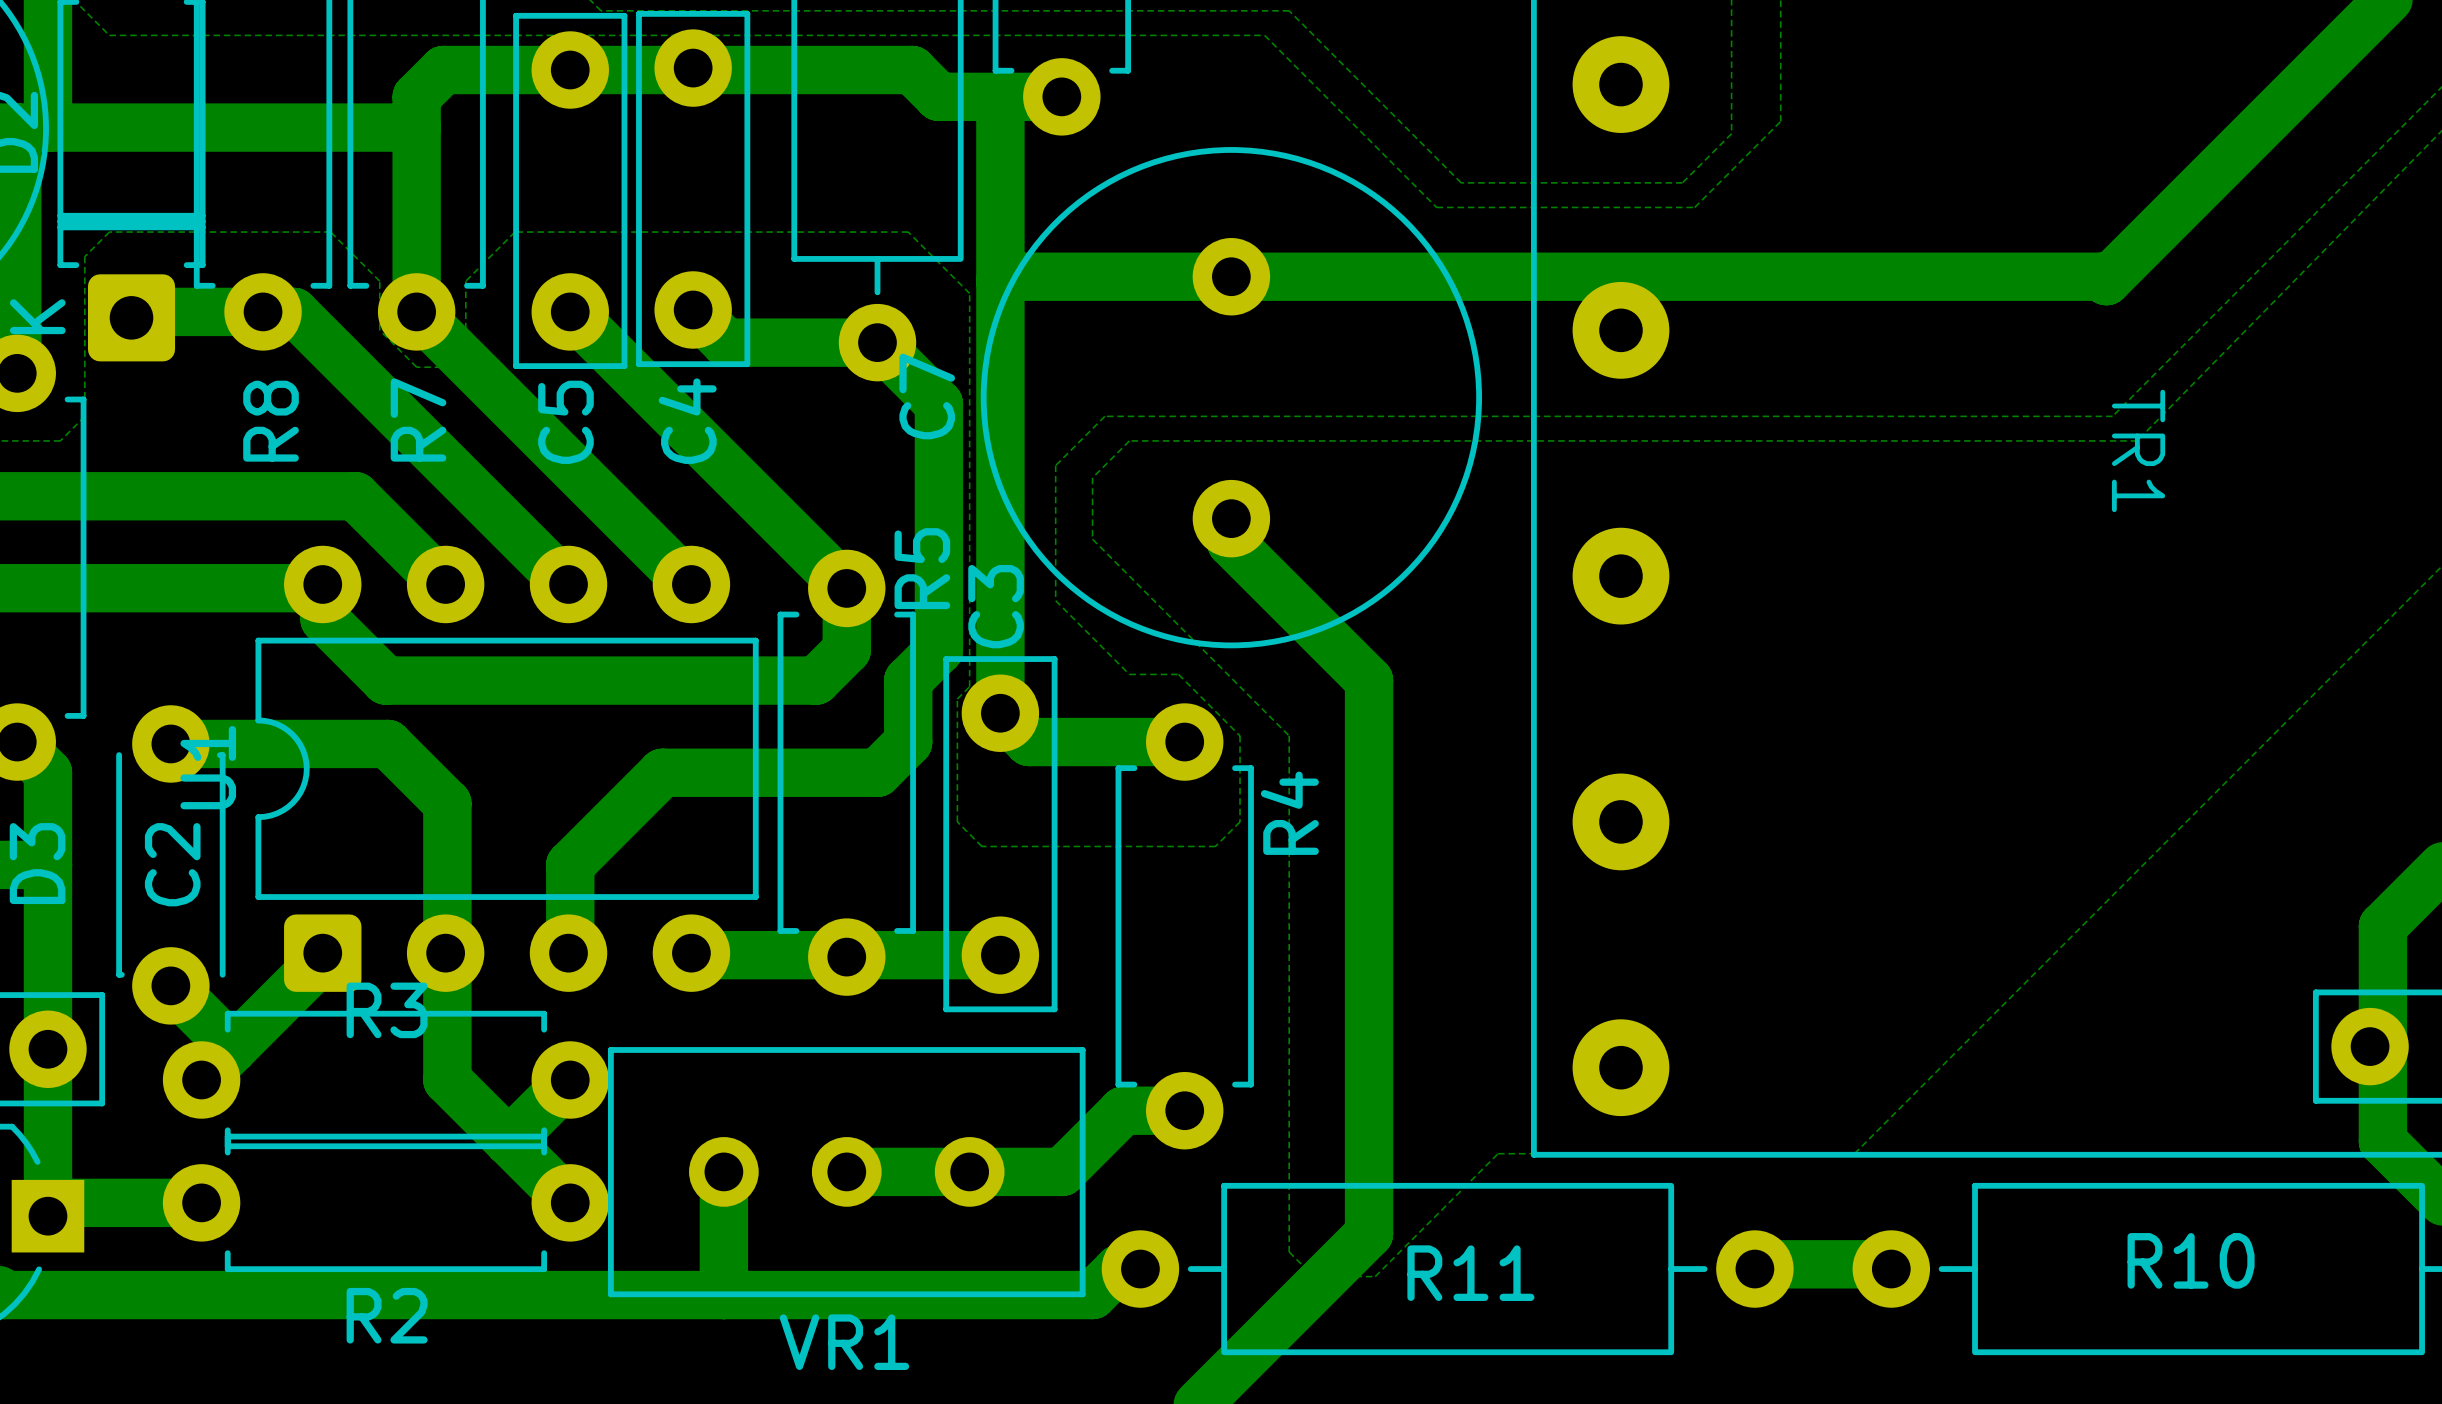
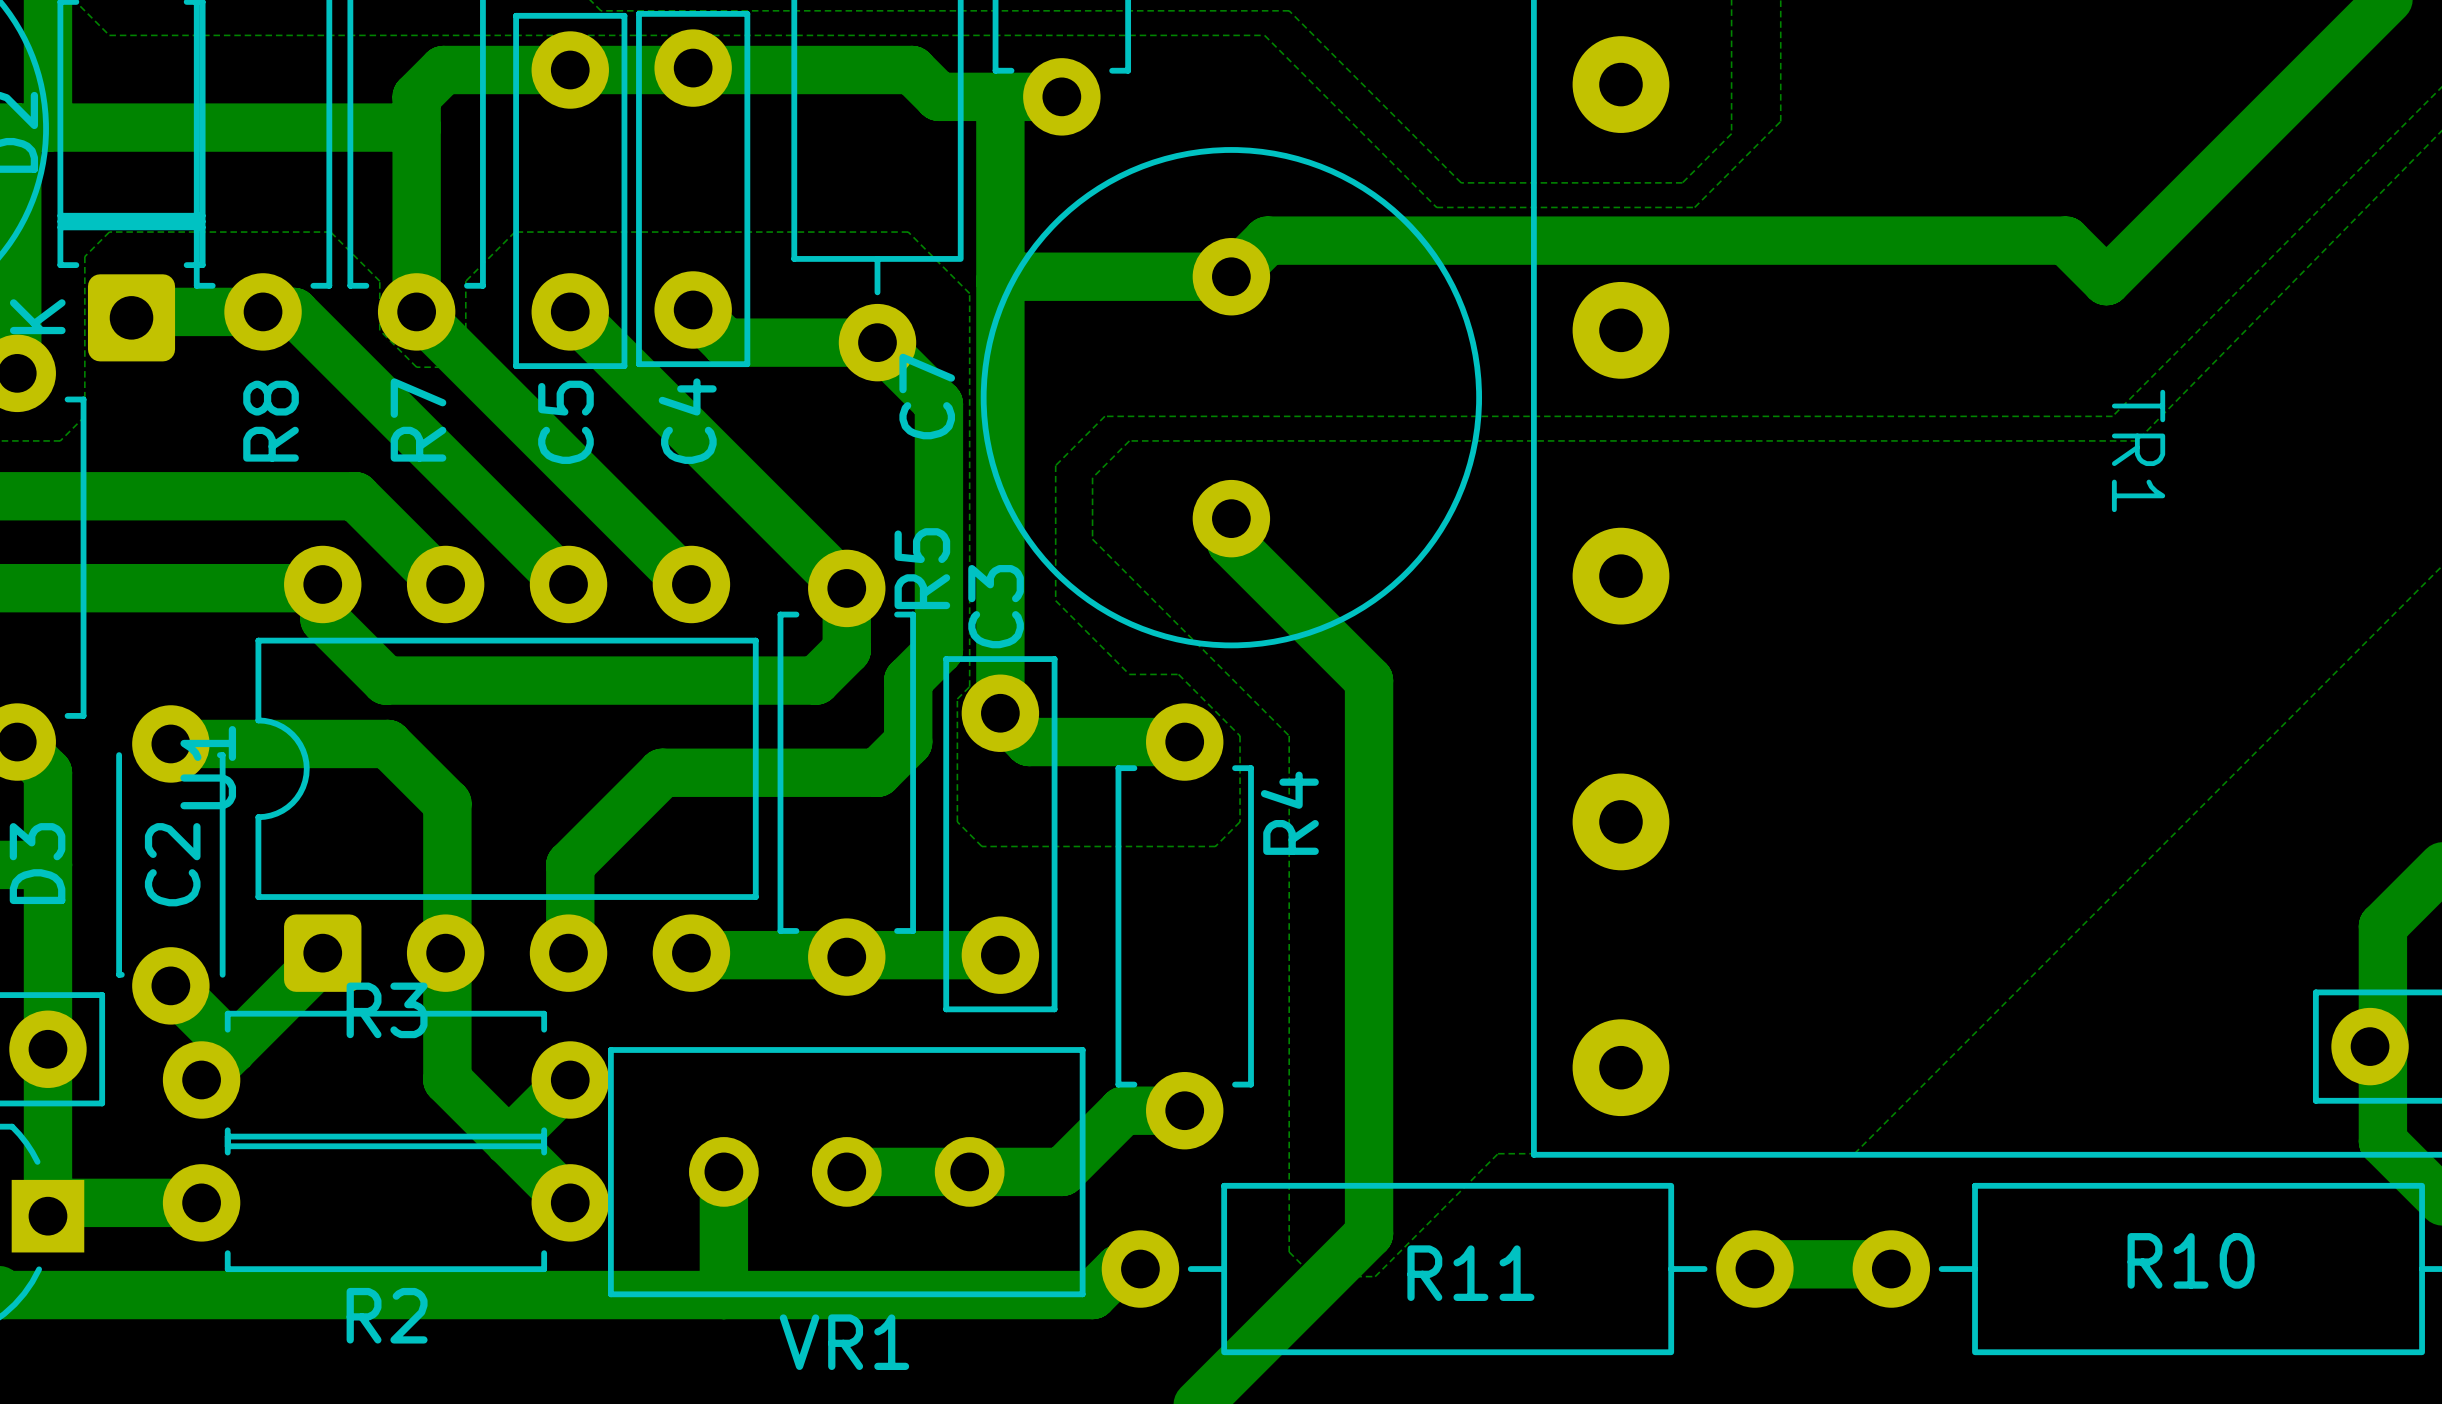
bottom track: (1231, 276) (2101, 276) -> (1231, 276) (1267, 240) (2065, 240) (2101, 276)

